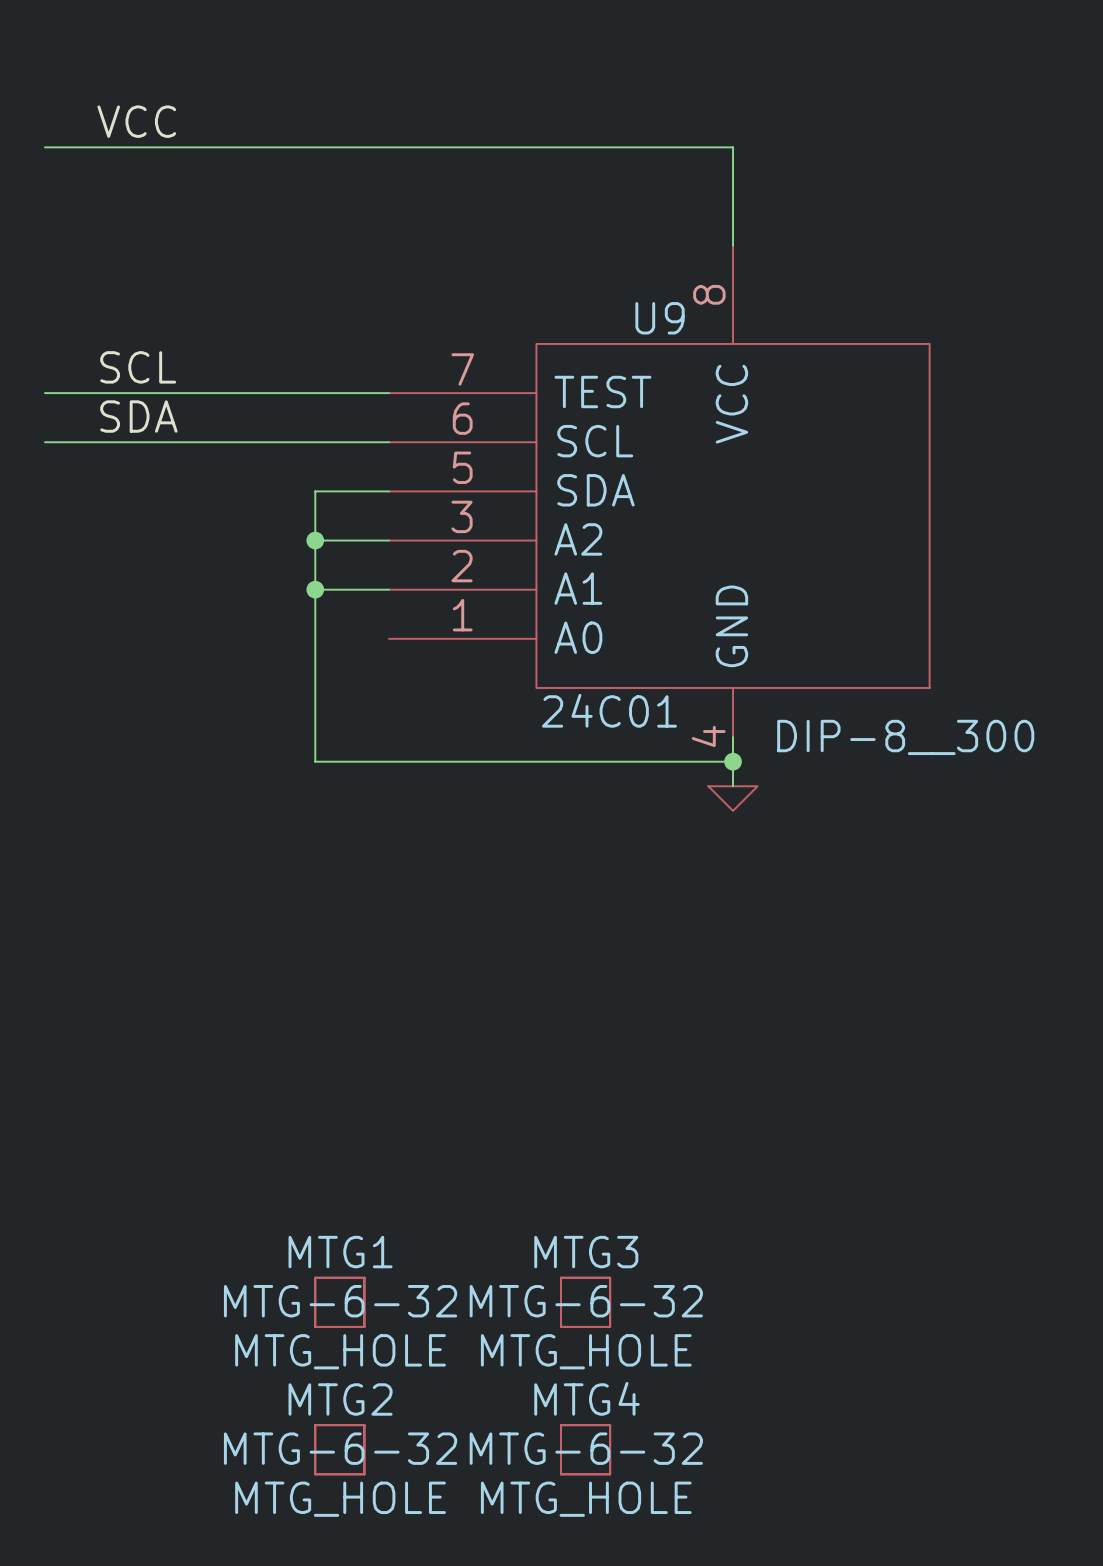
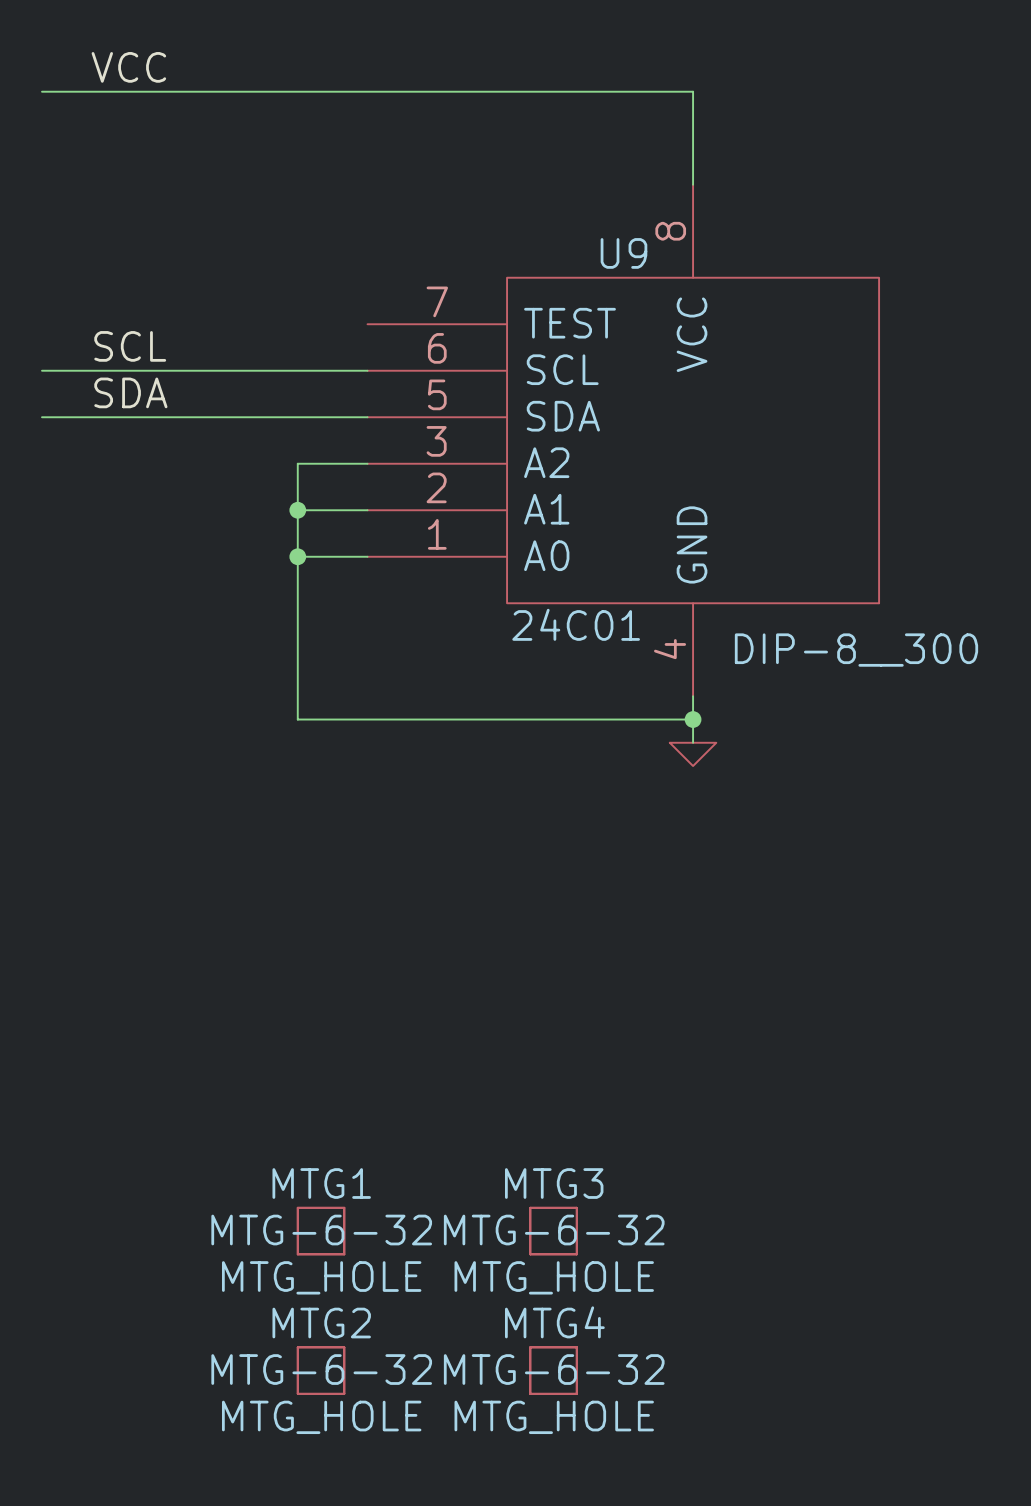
label position: VCC (136, 121) -> VCC (128, 67)
wire: (44, 147) (733, 147) -> (42, 91) (693, 91) (693, 138)
U9 position: (659, 515) -> (623, 440)

